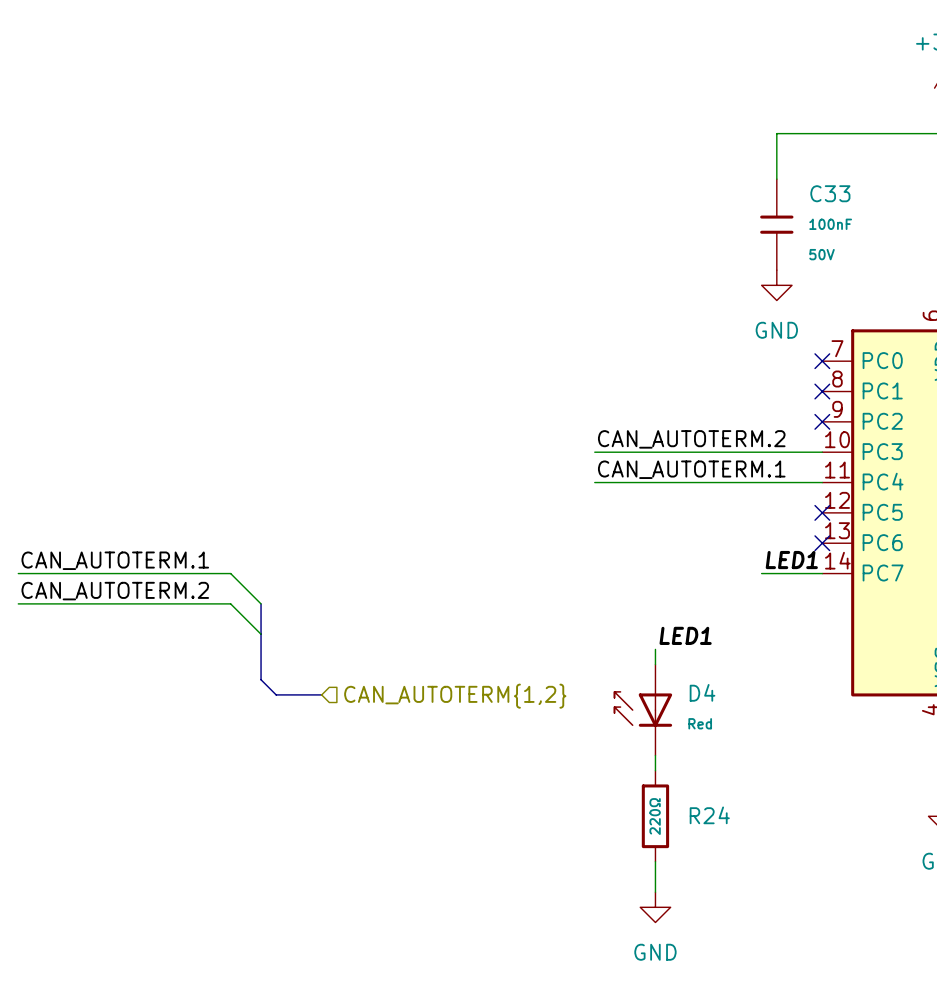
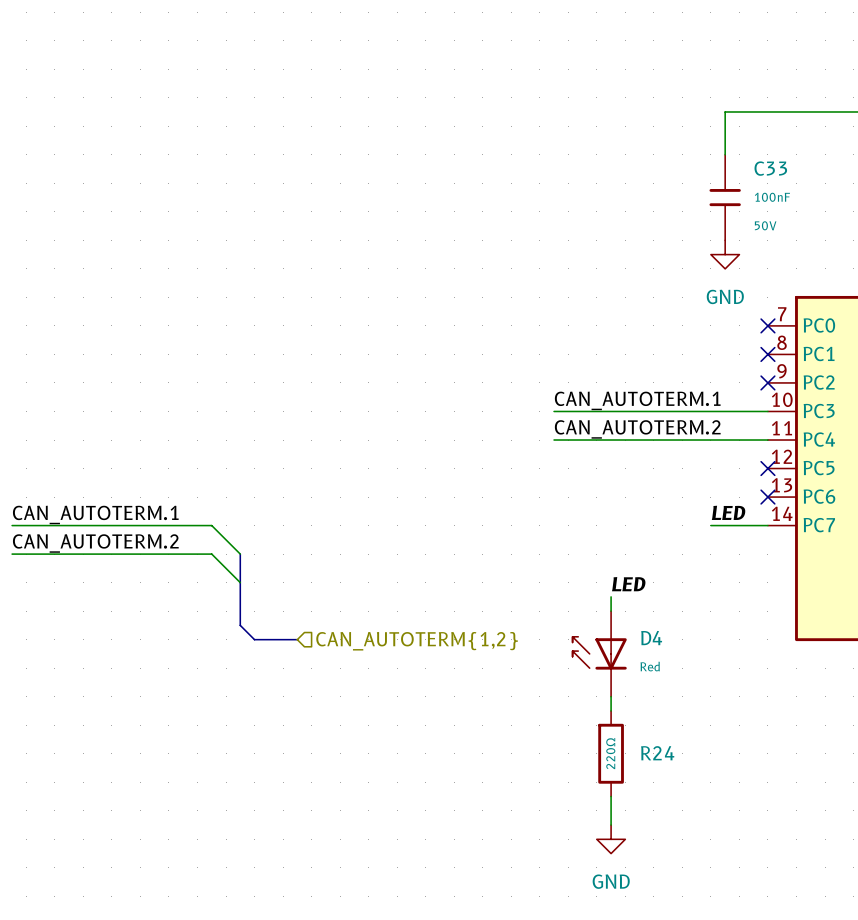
label: CAN_AUTOTERM.2 (691, 439) -> CAN_AUTOTERM.1 (637, 400)
label: CAN_AUTOTERM.1 (691, 469) -> CAN_AUTOTERM.2 (637, 429)
label: LED1 (791, 560) -> LED (728, 512)
label: LED1 (685, 635) -> LED (628, 584)

